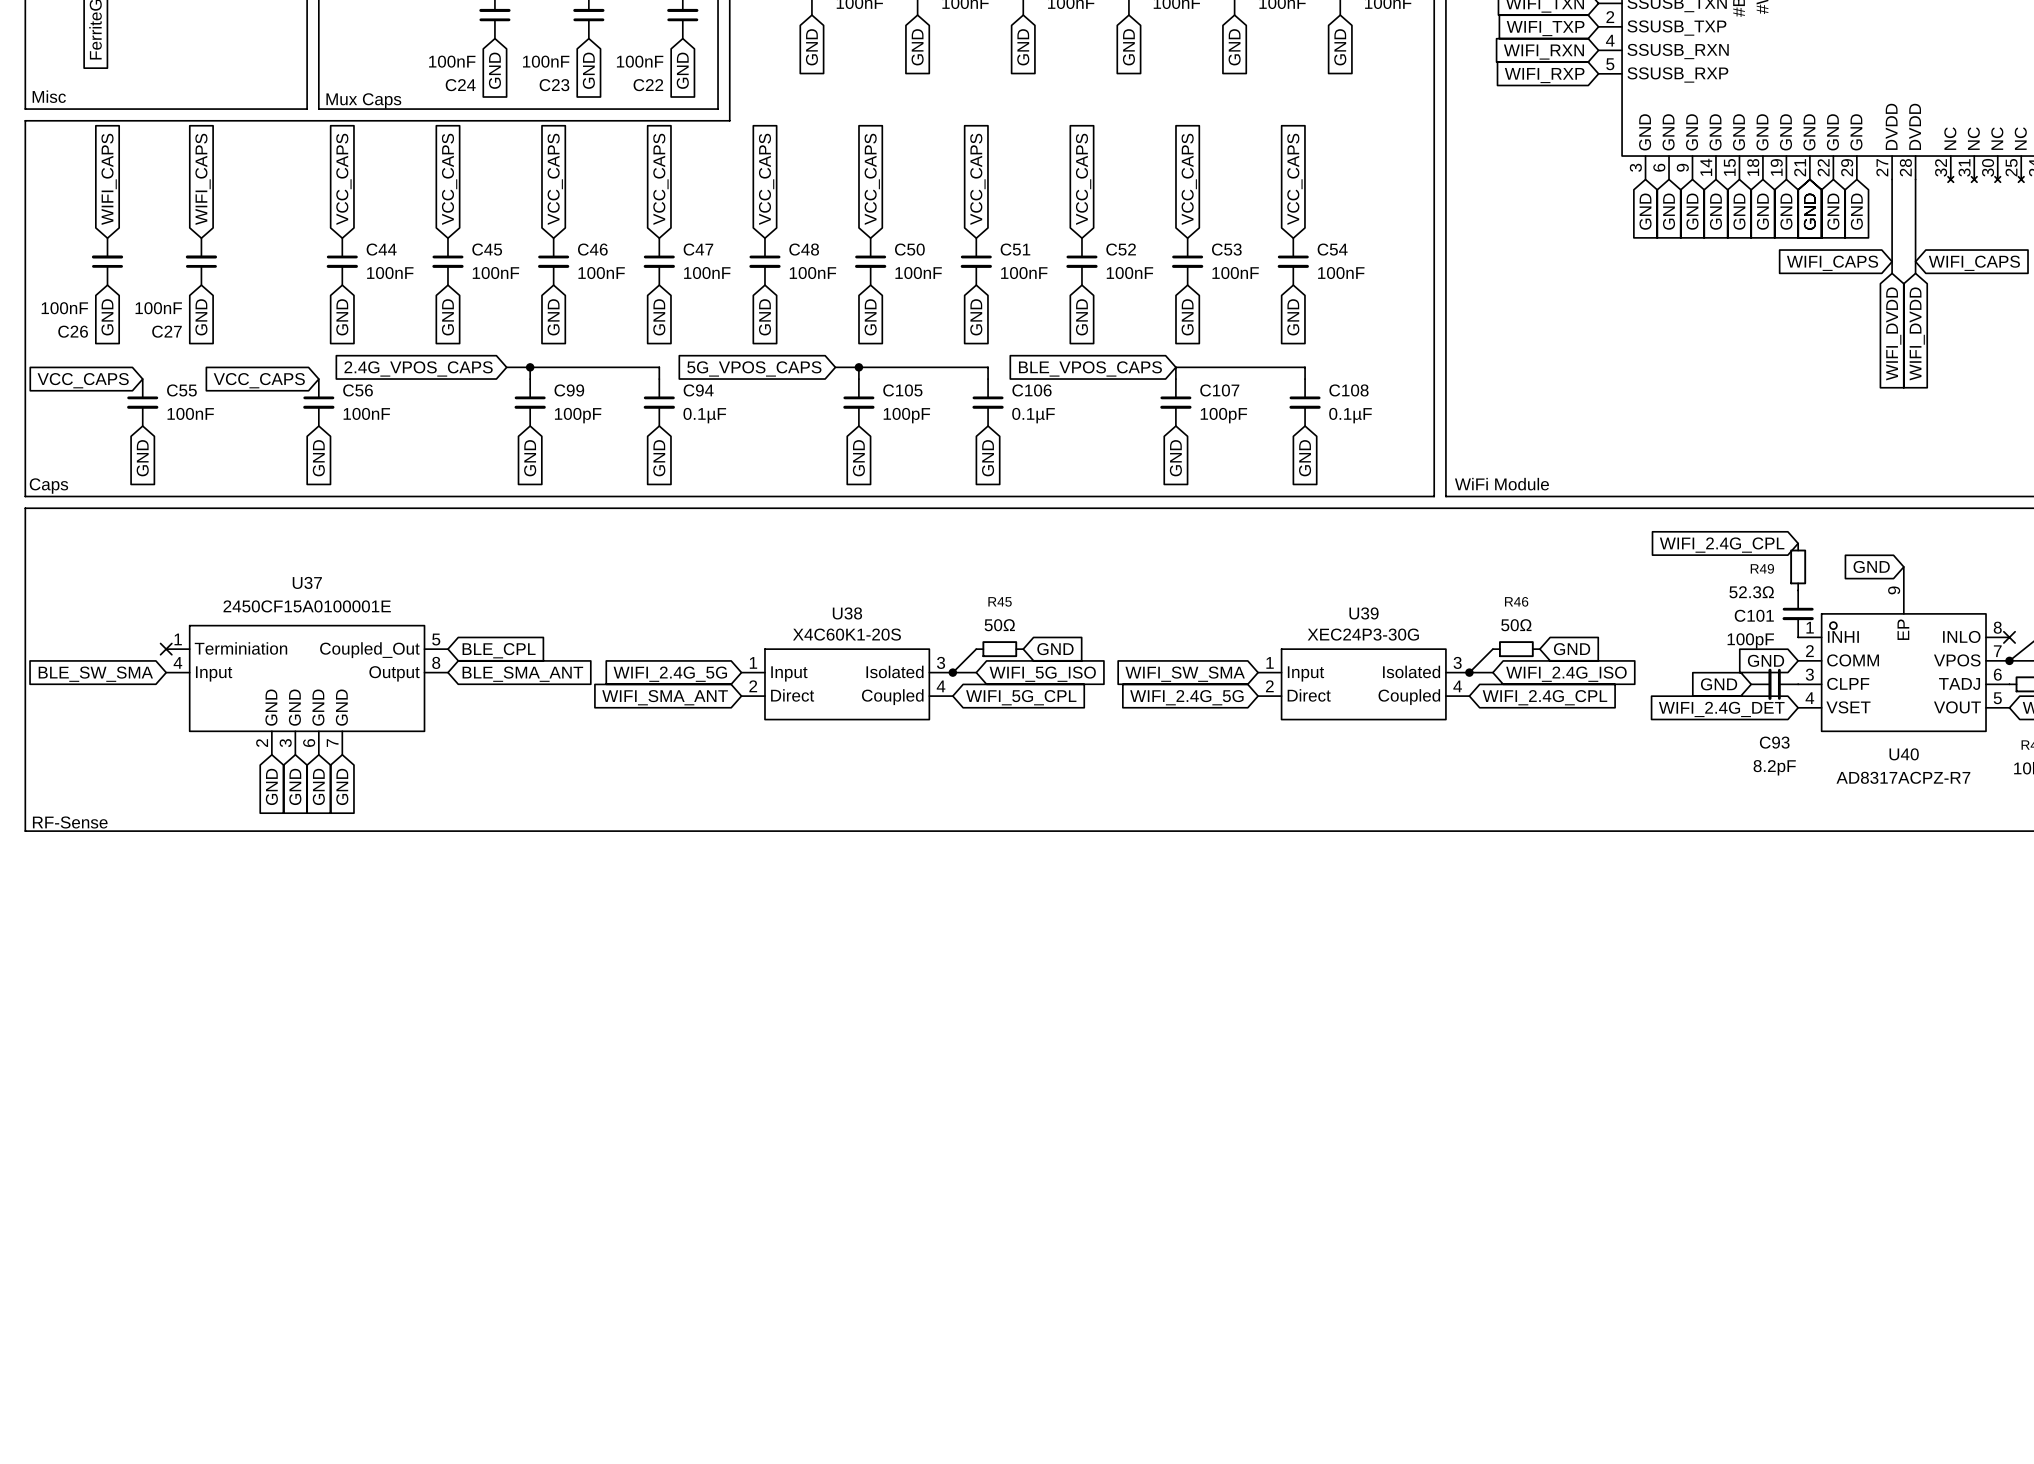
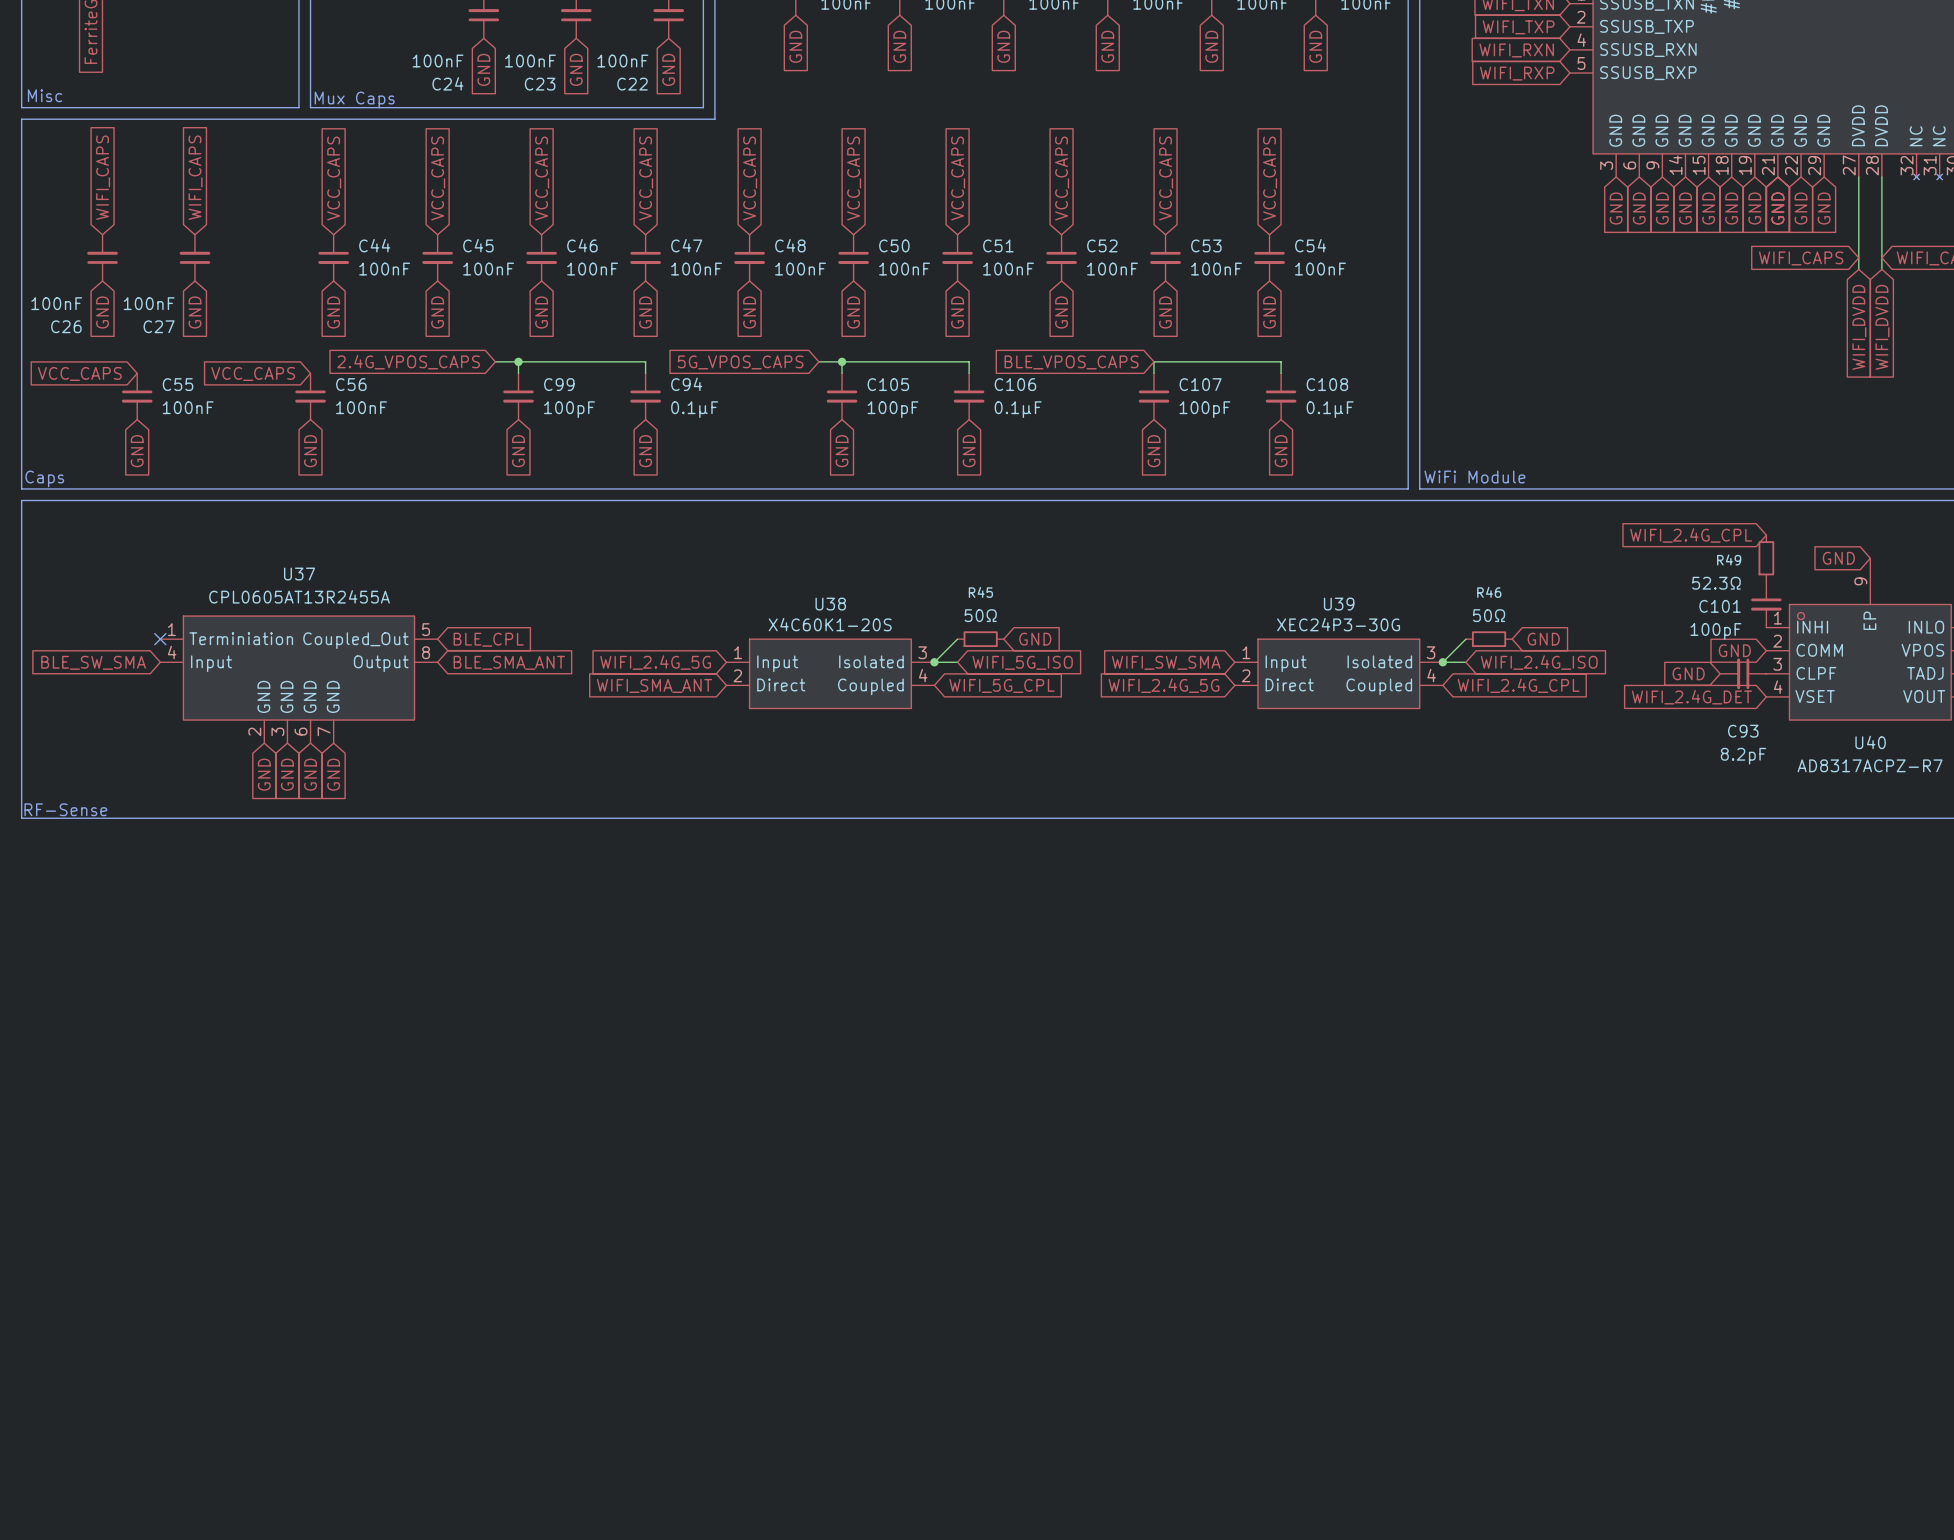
U37 value: 2450CF15A0100001E (307, 606) -> CPL0605AT13R2455A (299, 596)

